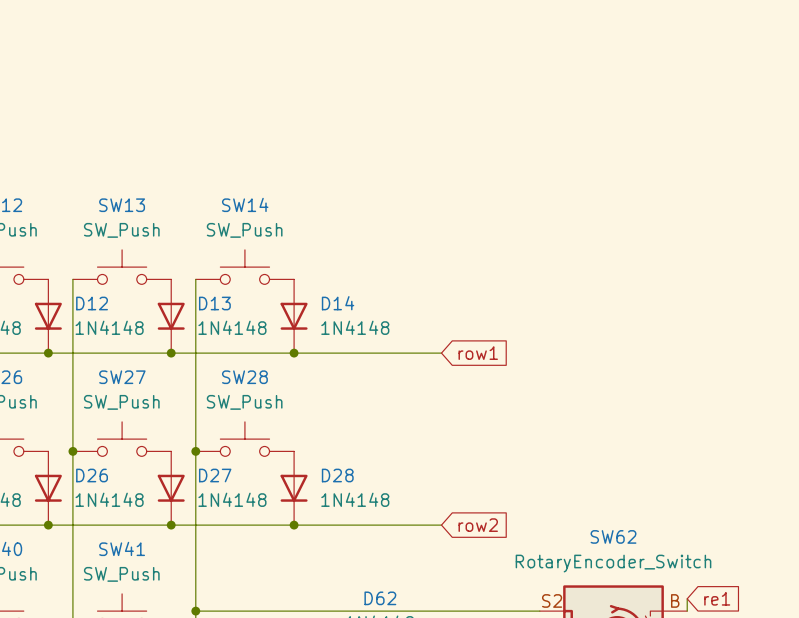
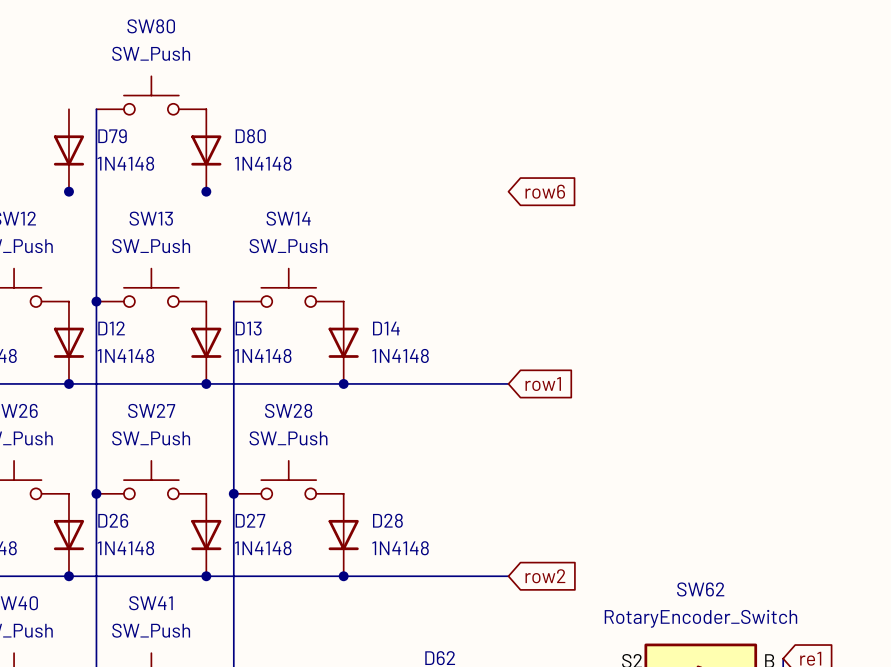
SW80: none -> SW_Push (151, 95)
wire: none -> (96, 109) (96, 301)
D79: none -> 1N4148 (68, 150)
D80: none -> 1N4148 (206, 150)
junction: none -> (68, 191)
junction: none -> (206, 191)
global label: none -> row6 (545, 191)
junction: none -> (96, 301)

